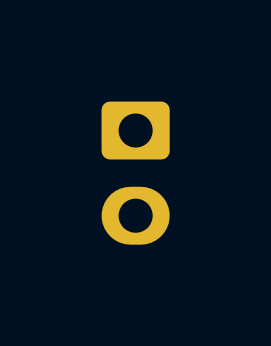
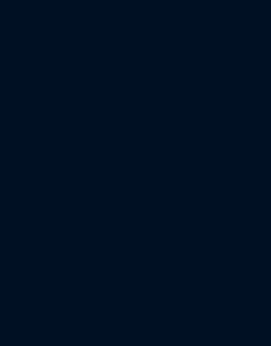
part: (135, 173) -> none

